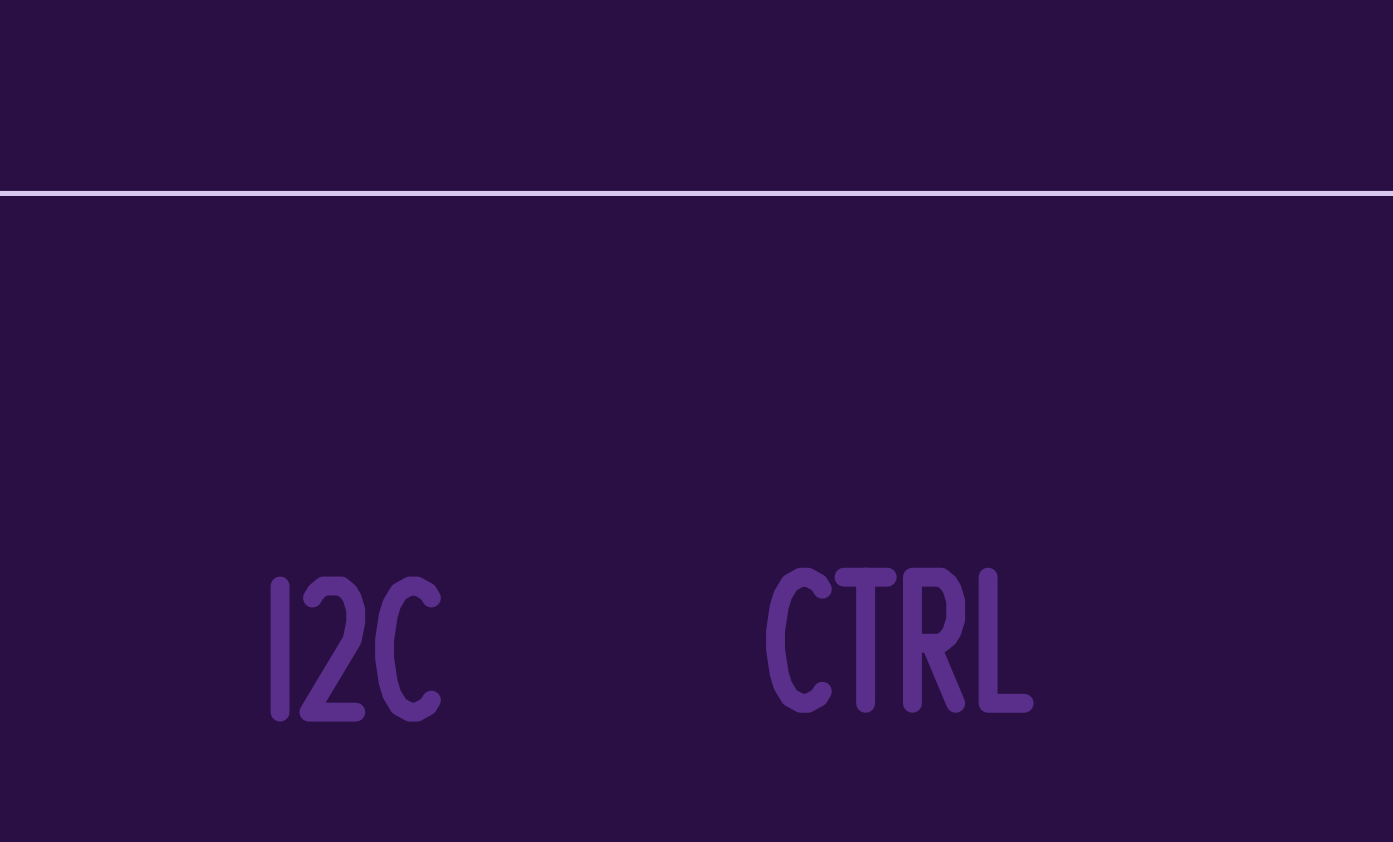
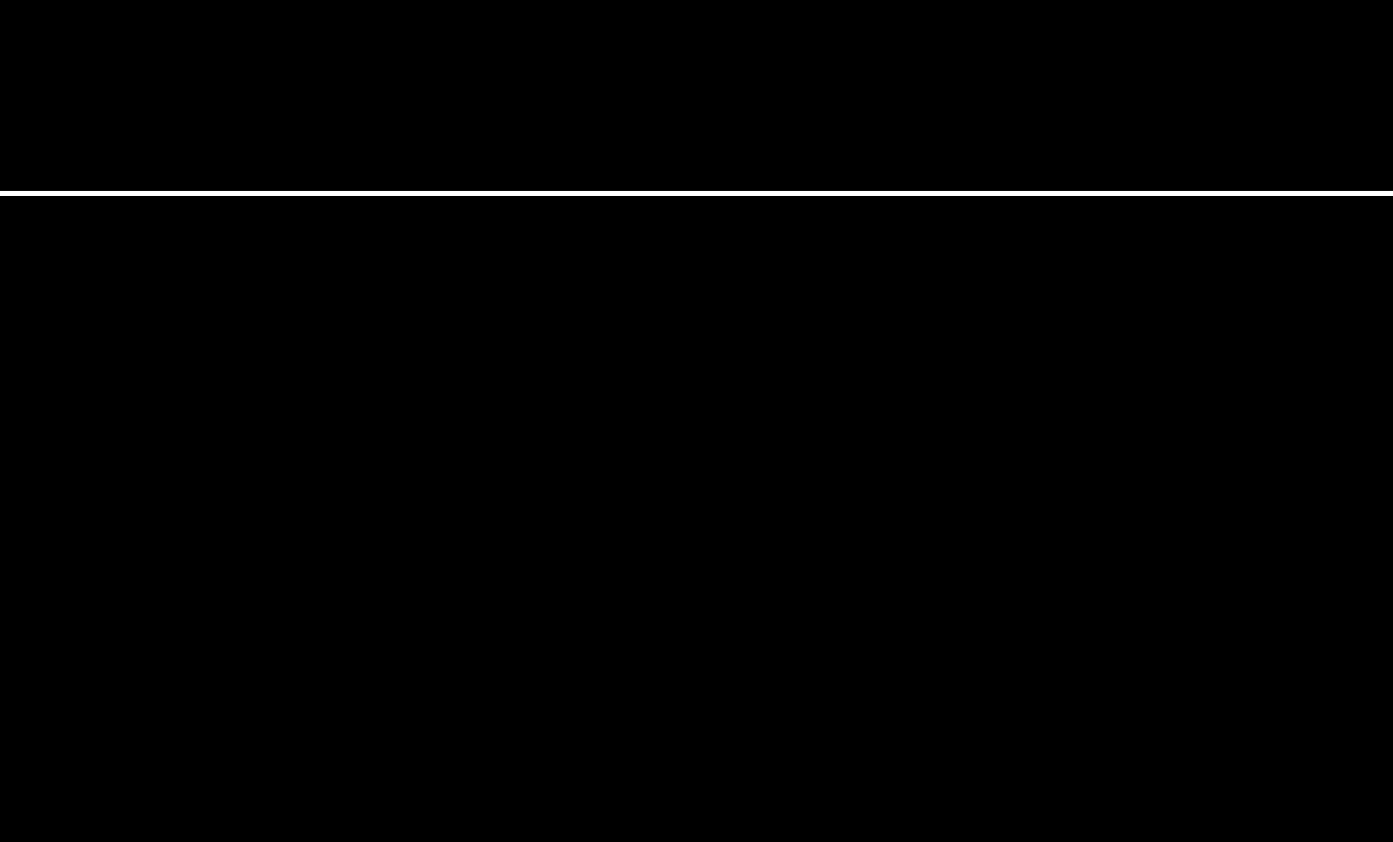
text: CTRL (899, 640) -> none
text: I2C (355, 649) -> none

